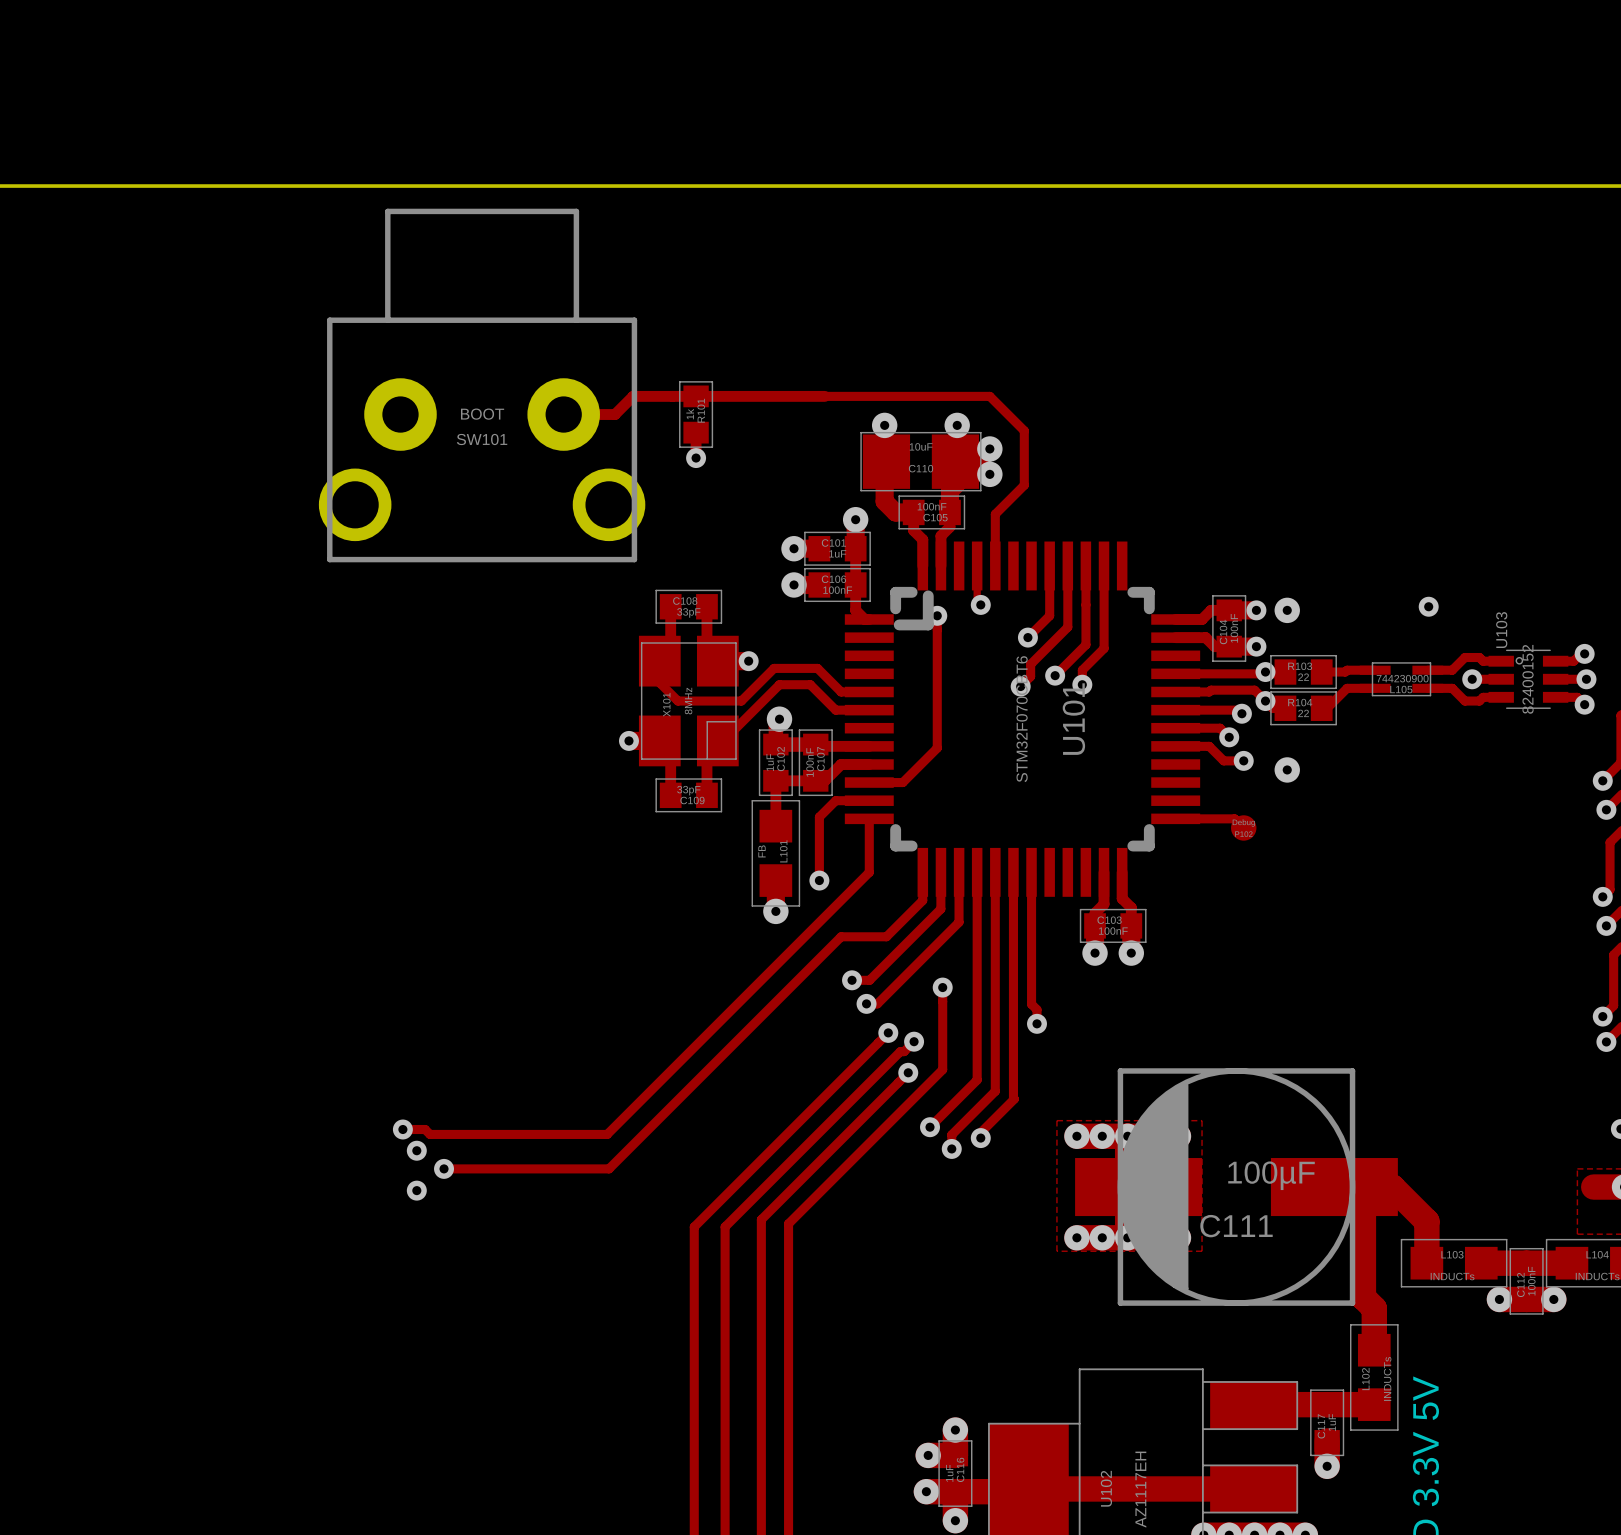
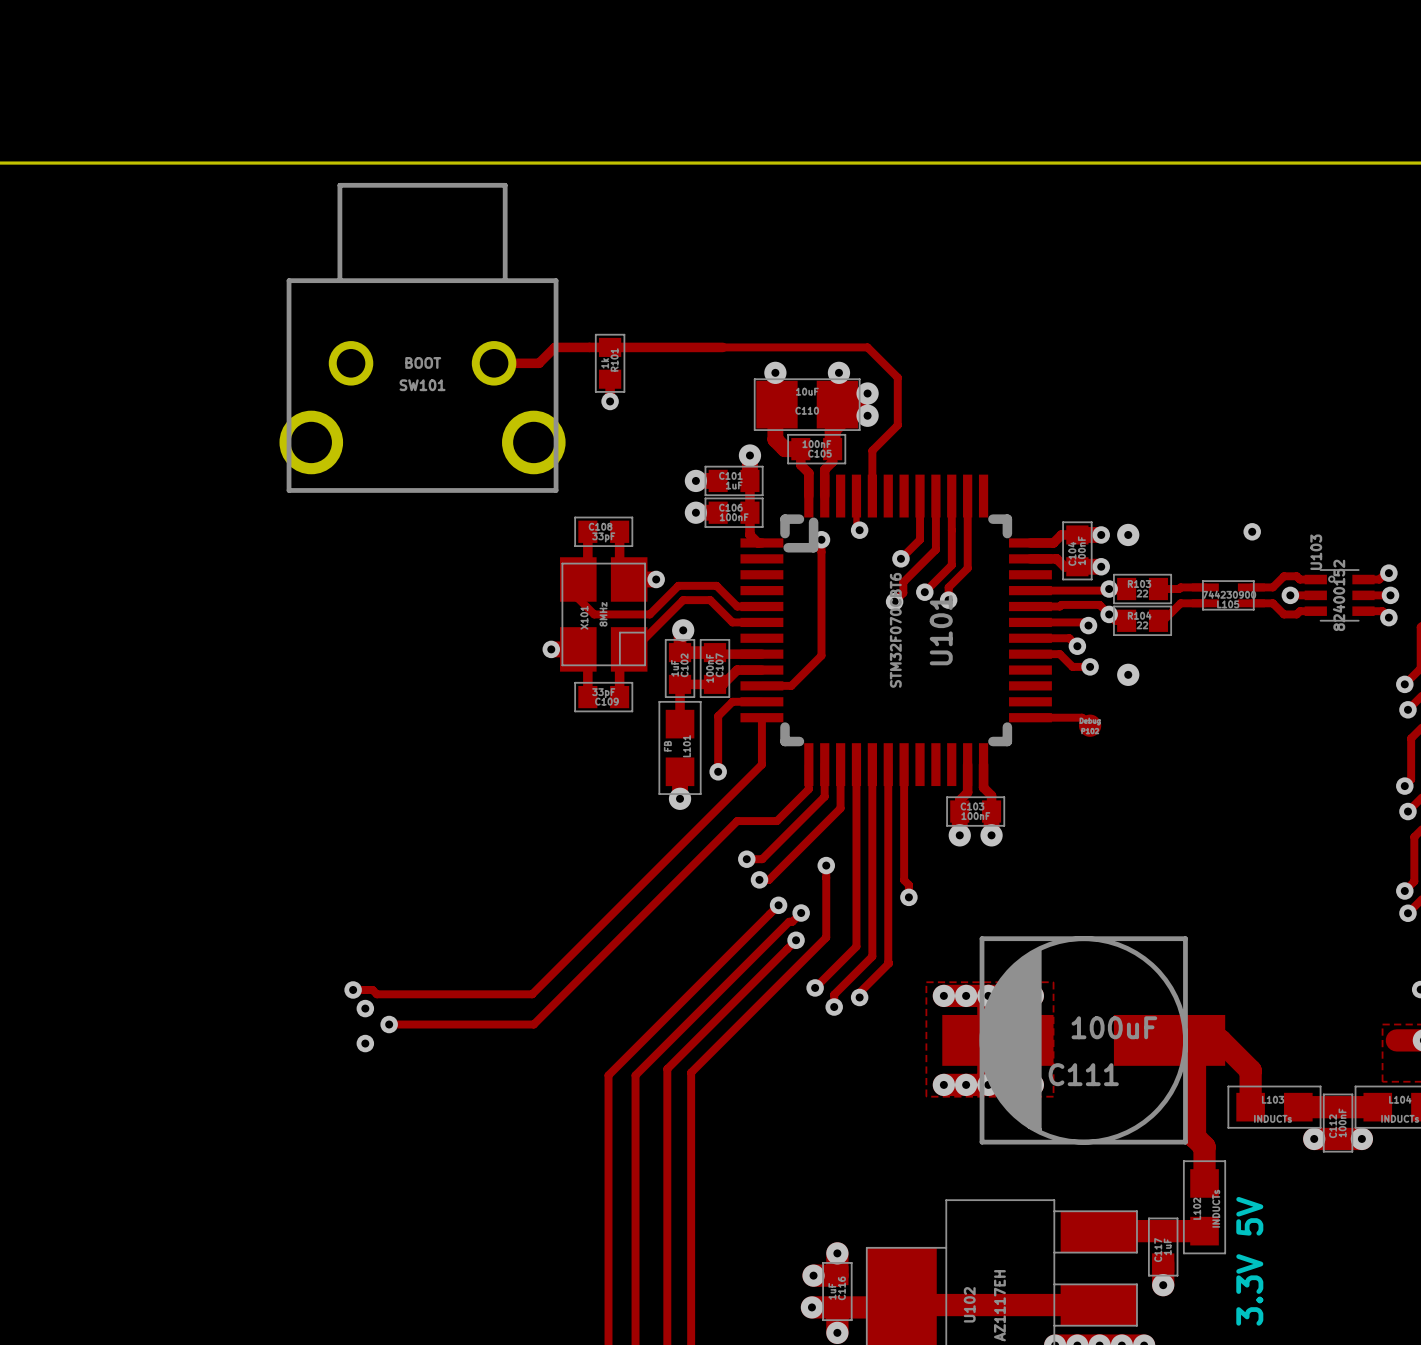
SW101 footprint: [318, 208, 646, 563] -> [279, 182, 566, 493]
C111 value: 100µF (1271, 1175) -> 100uF (1114, 1027)

